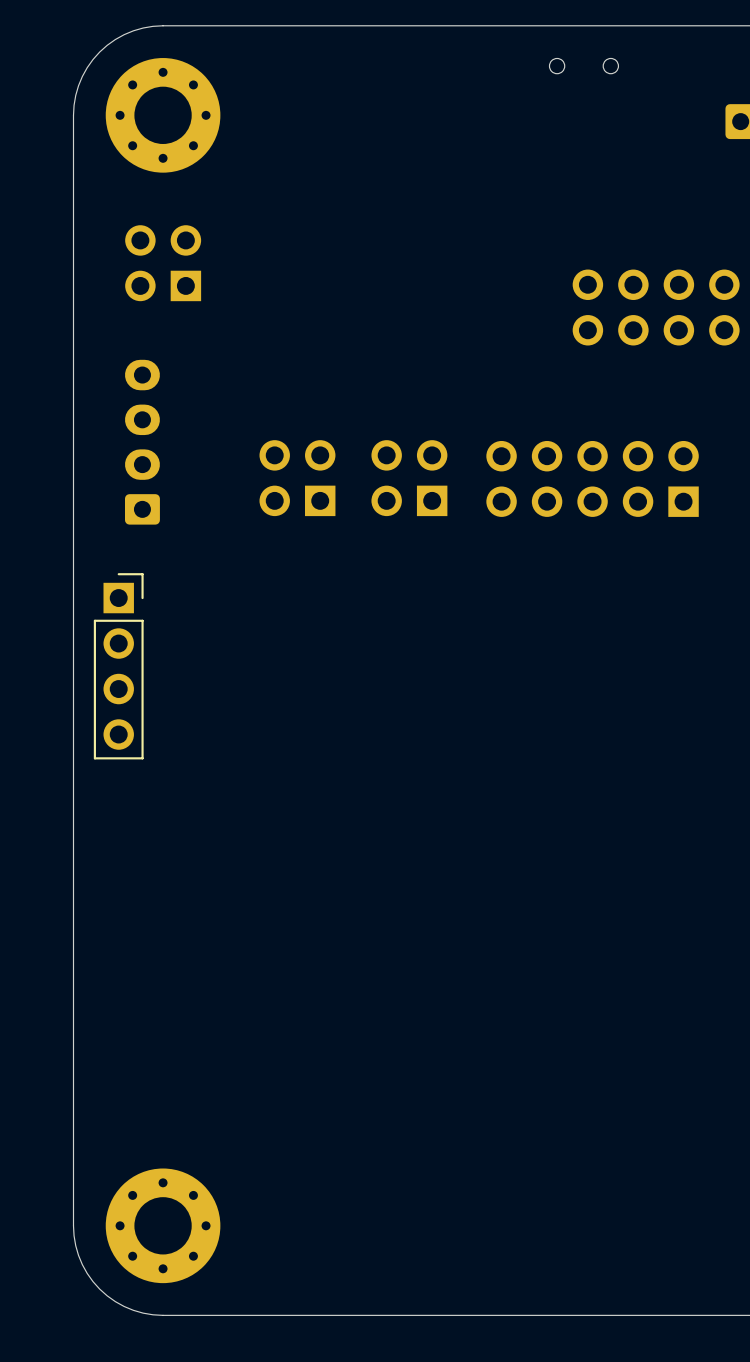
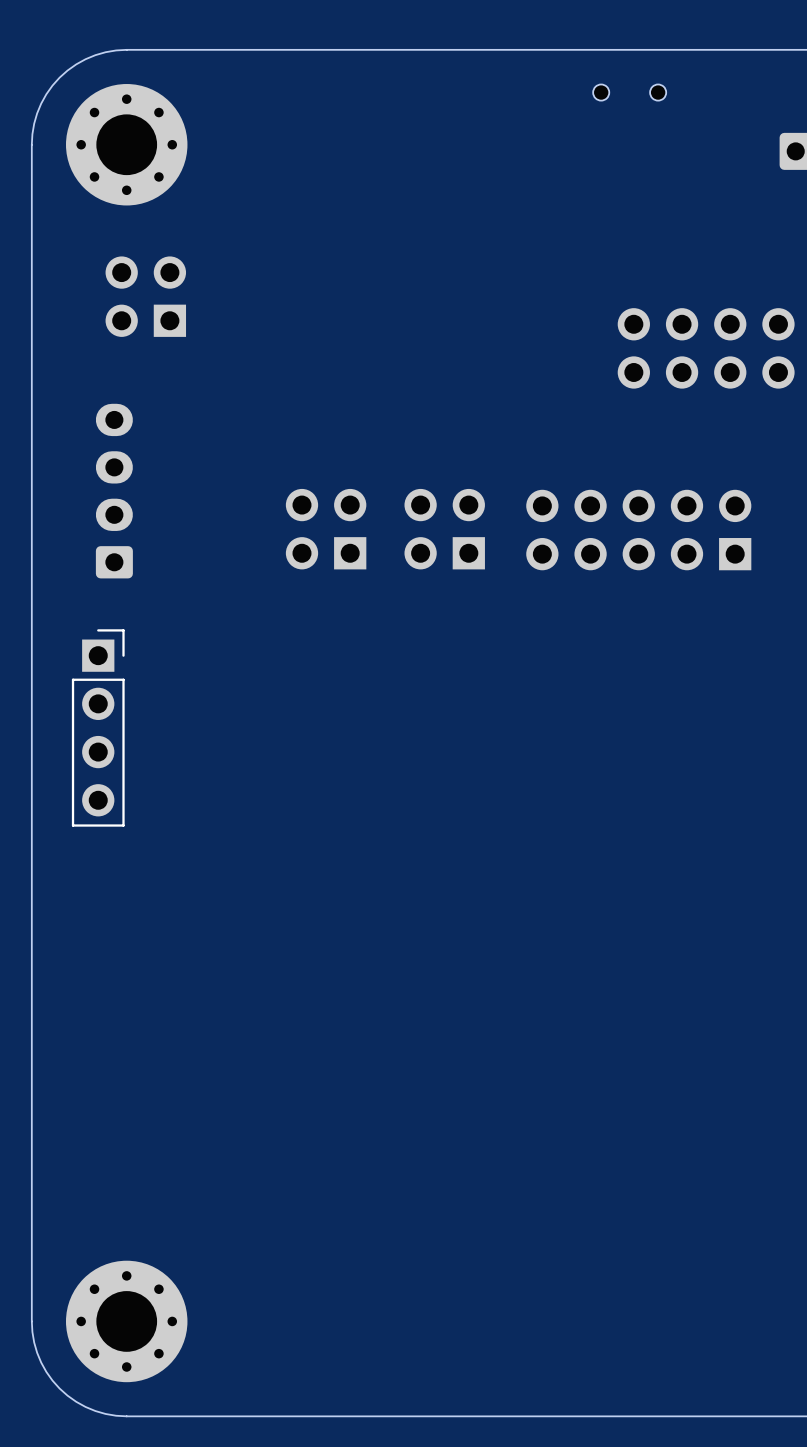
board edge: (163, 25) (133, 30) (115, 39) (99, 52) (82, 76) (75, 95) (73, 115) (74, 1235) (82, 1264) (99, 1289) (124, 1306) (143, 1313) (163, 1315) -> (183, 49) (116, 50) (95, 55) (76, 64) (59, 77) (46, 94) (37, 113) (31, 144) (32, 1332) (37, 1352) (46, 1371) (59, 1388) (76, 1401) (95, 1411) (116, 1415) (183, 1416)
part position: (163, 115) -> (126, 144)
part position: (163, 263) -> (145, 296)
part position: (142, 442) -> (114, 491)
part position: (118, 666) -> (98, 727)
part position: (163, 1225) -> (126, 1321)

